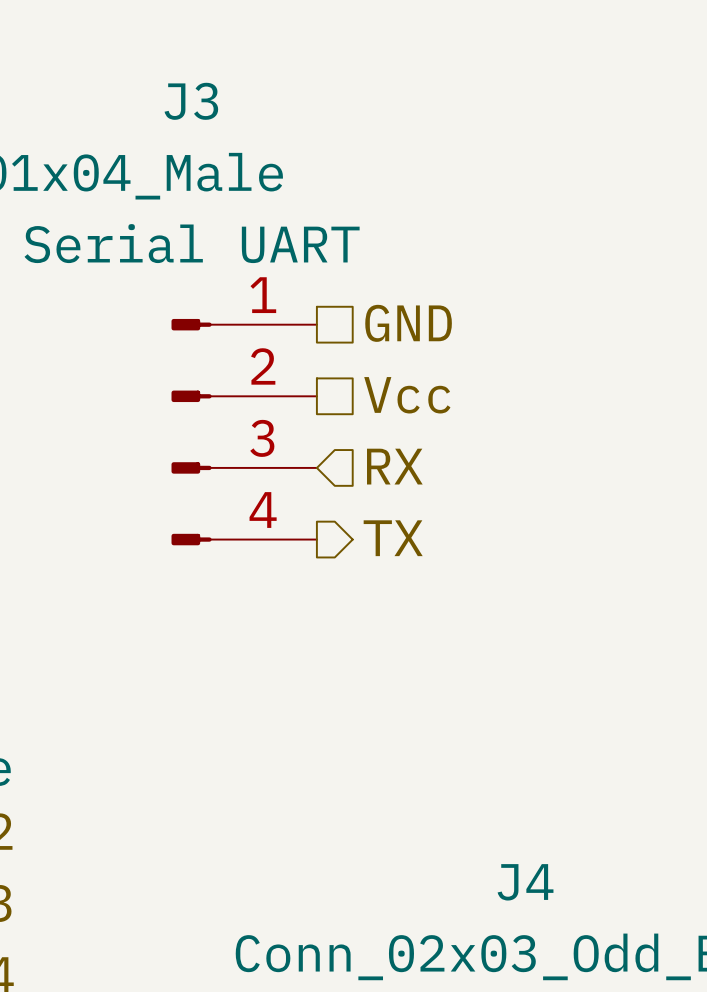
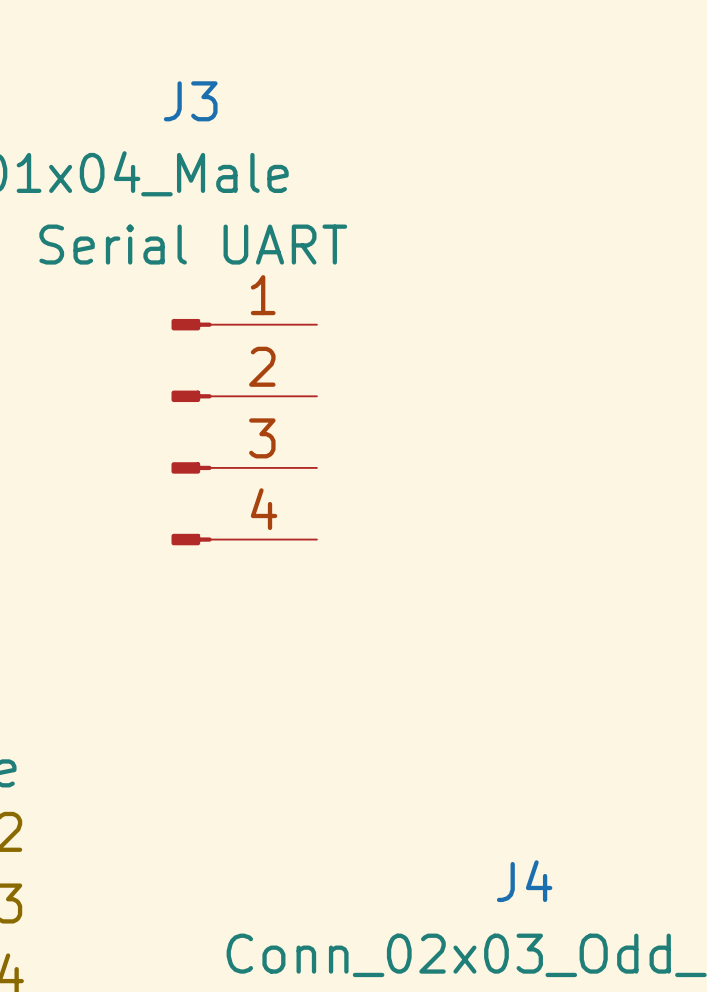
hierarchical label: GND (408, 323) -> none
hierarchical label: Vcc (407, 395) -> none
hierarchical label: RX (394, 466) -> none
hierarchical label: TX (393, 538) -> none

